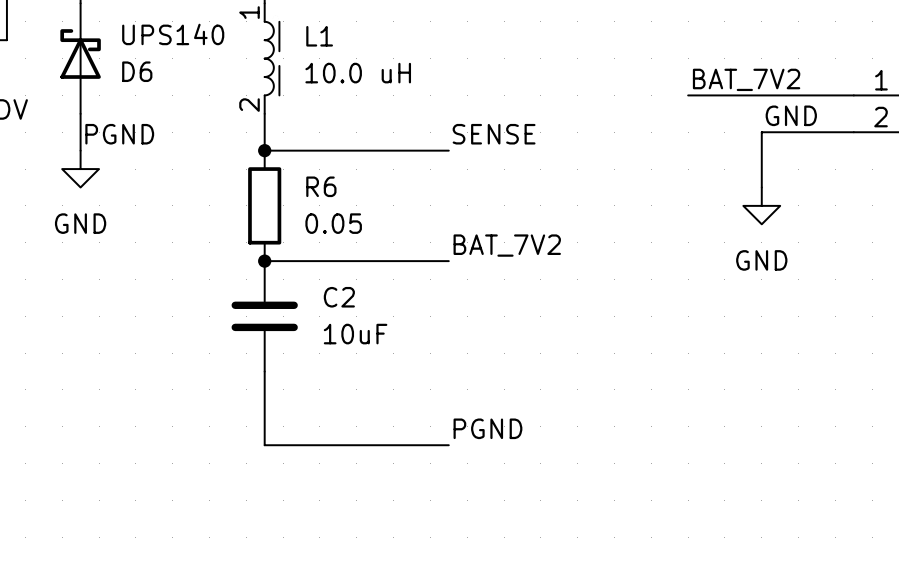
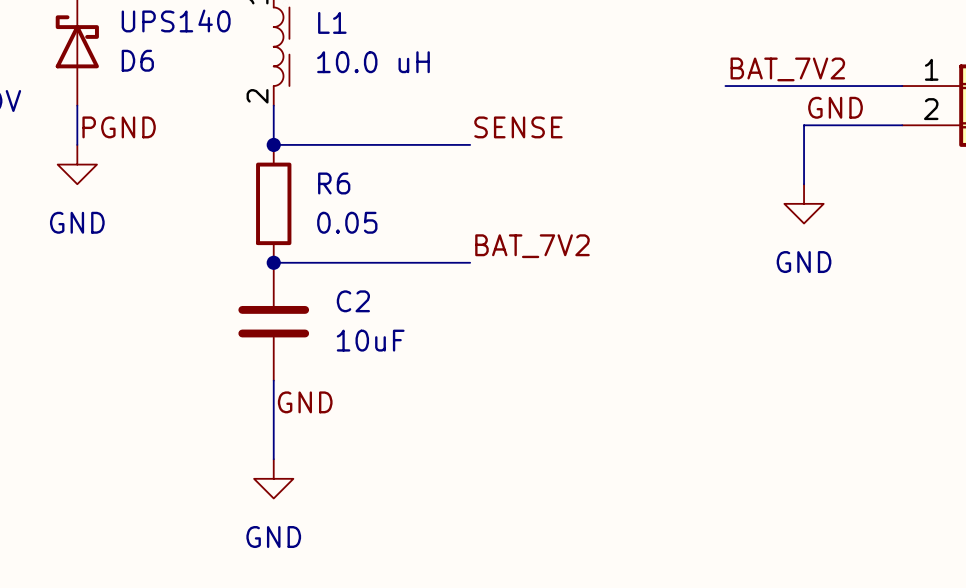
label: none -> GND (305, 402)
label: PGND (487, 428) -> none
wire: (264, 445) (448, 445) -> none
power symbol: none -> GND (273, 478)

